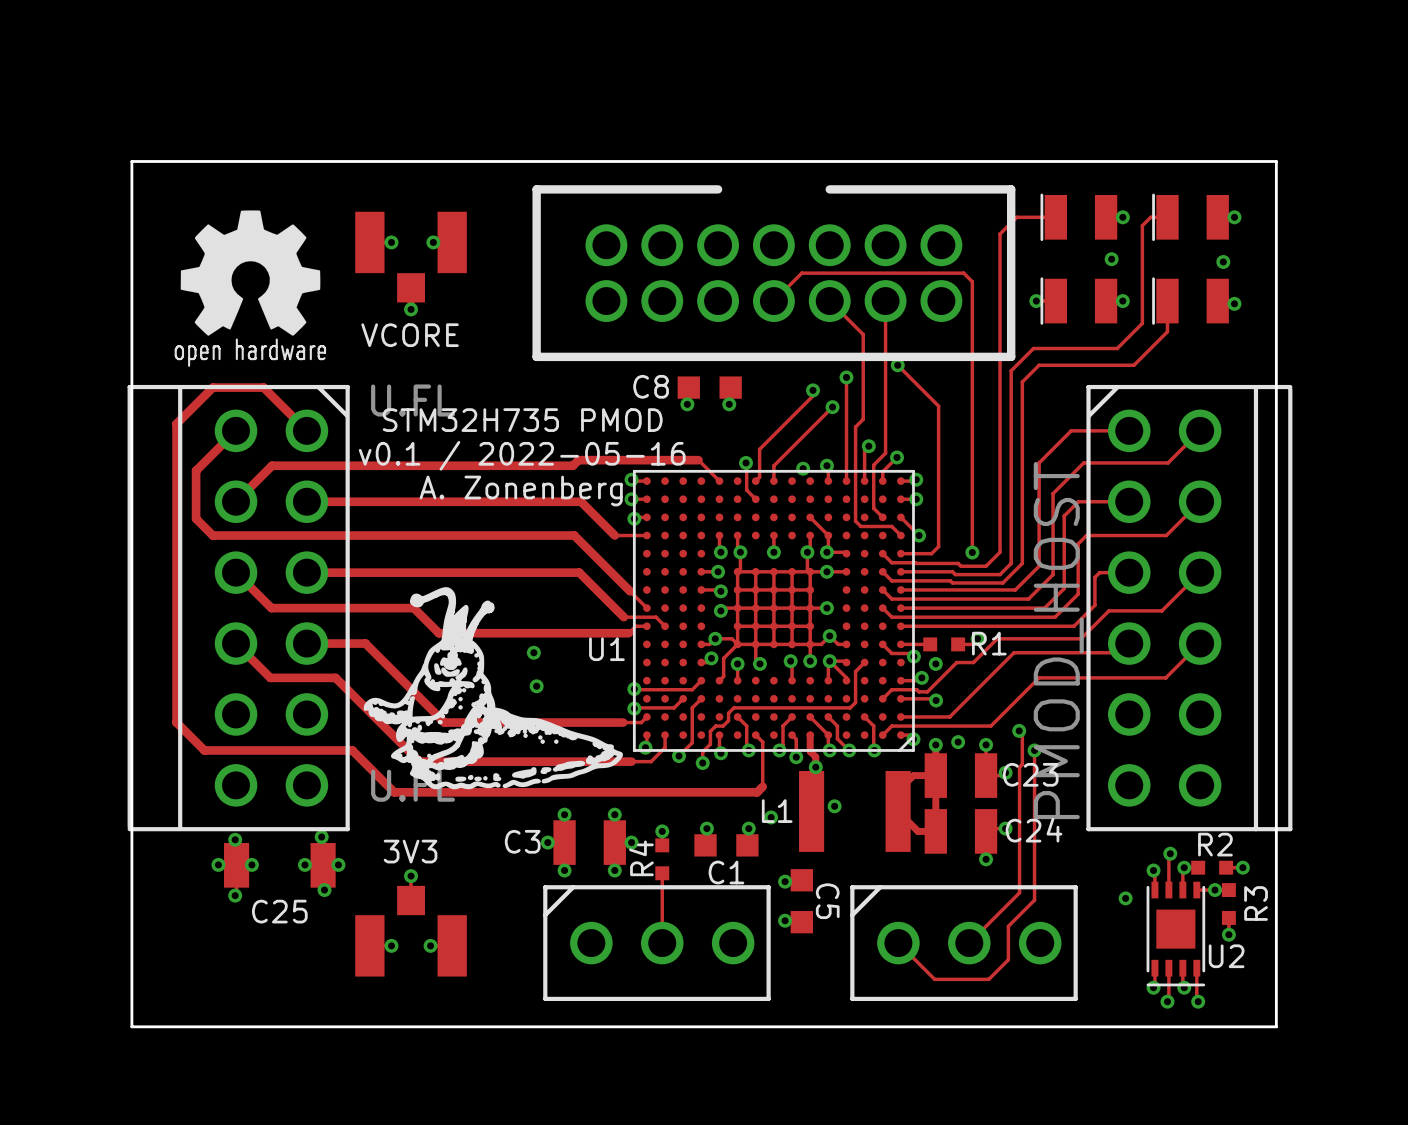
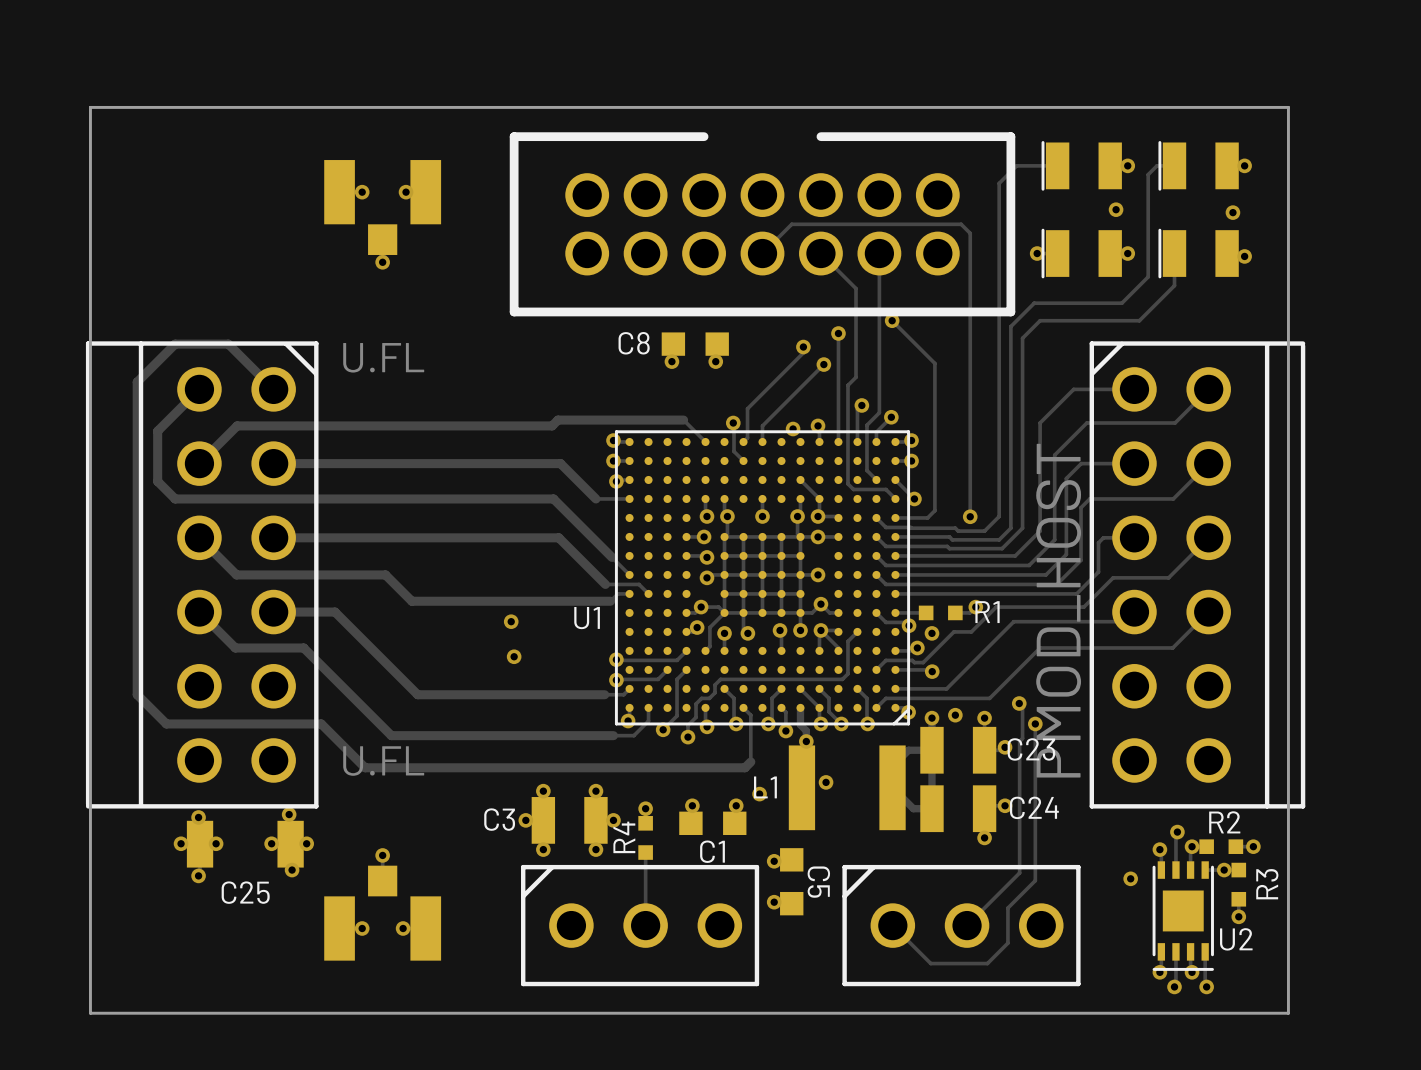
drawing: [174, 210, 327, 367] -> none
text: VCORE (410, 335) -> none
text: STM32H735 PMOD (522, 420) -> none
text: v0.1 / 2022-05-16 (522, 455) -> none
text: A. Zonenberg (521, 490) -> none
drawing: [363, 587, 624, 790] -> none
text: 3V3 (410, 851) -> none

